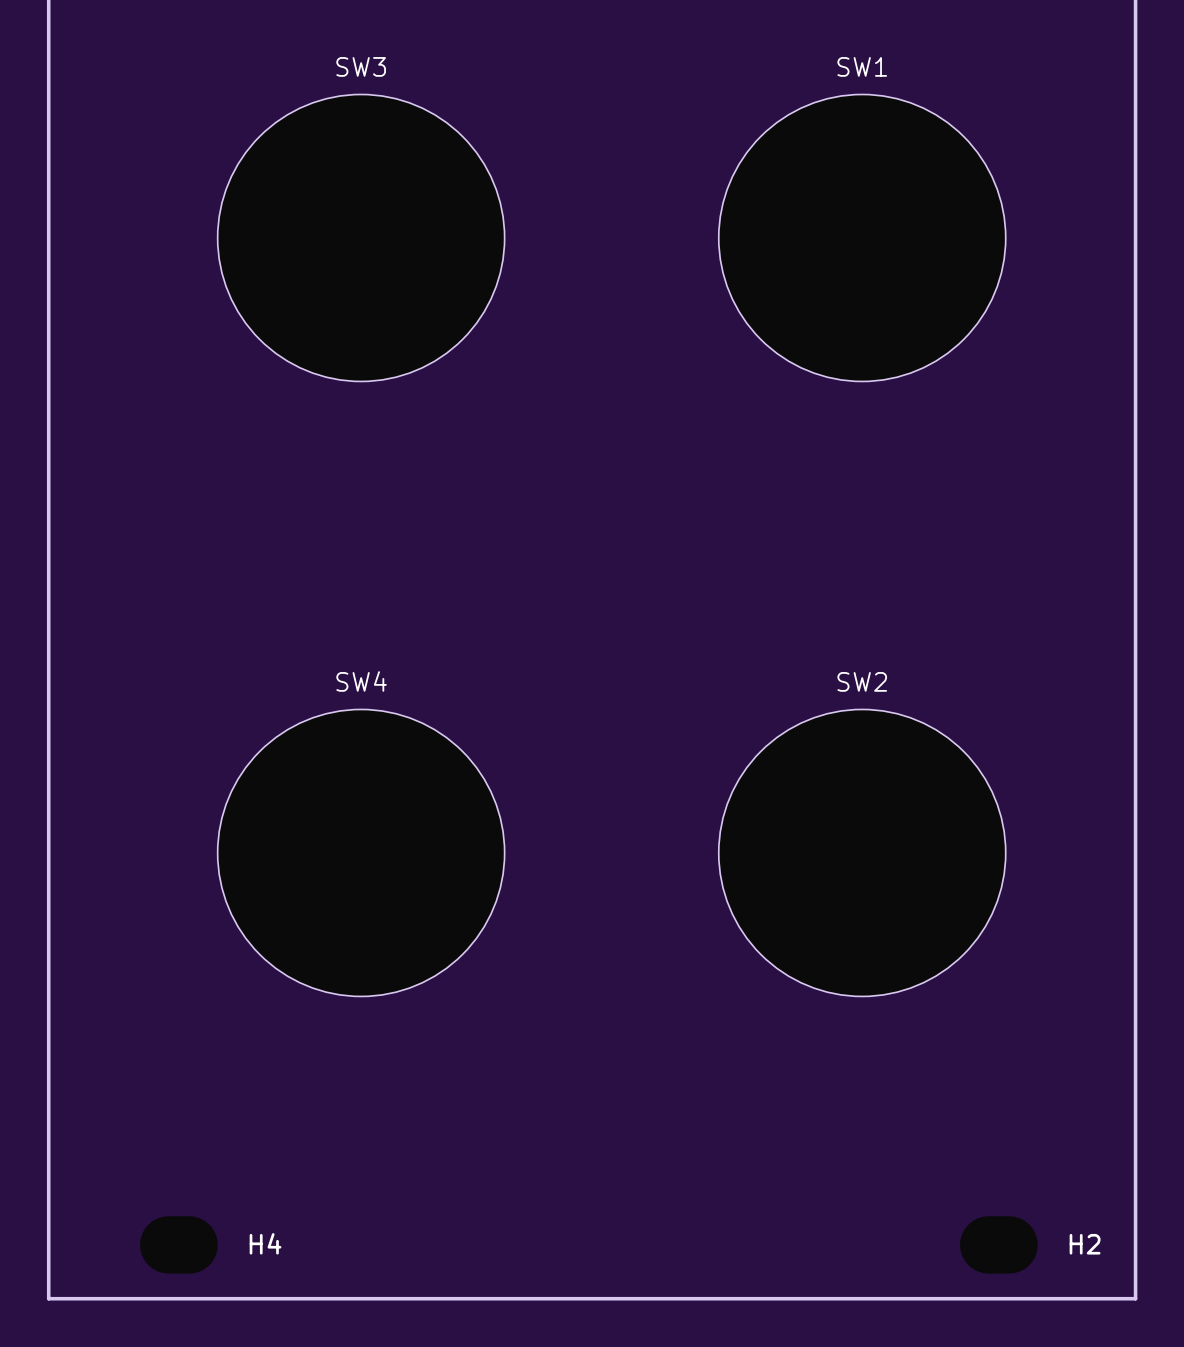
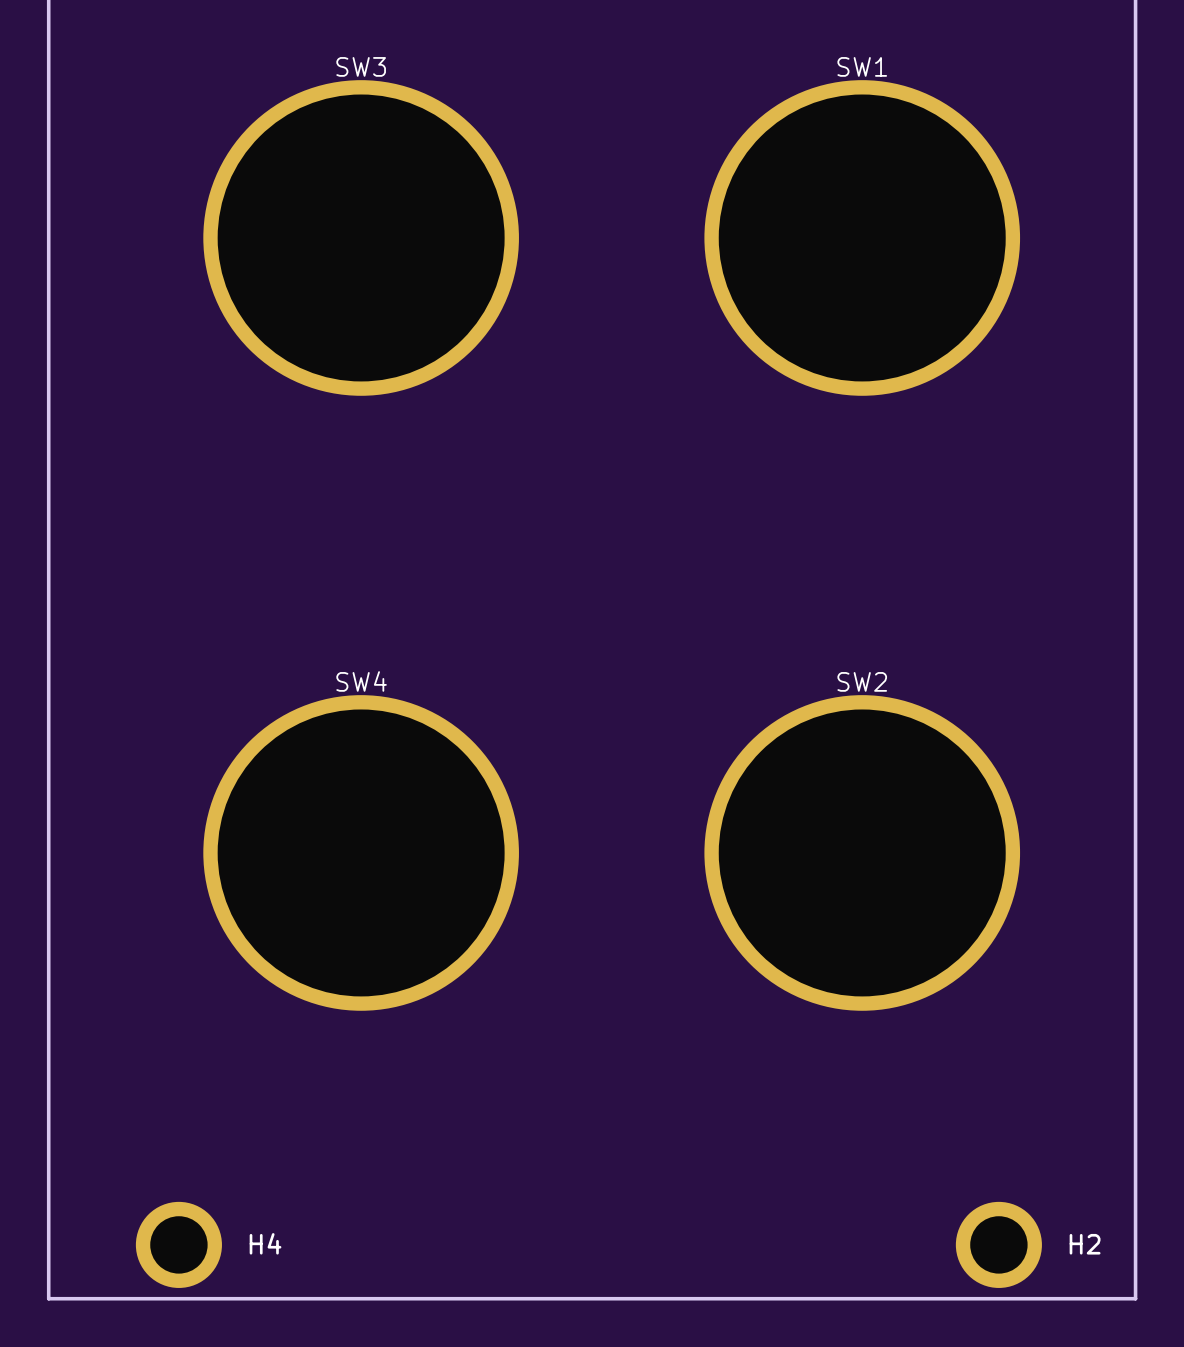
SW3 footprint: [217, 94, 505, 382] -> [203, 80, 519, 396]
SW1 footprint: [718, 94, 1006, 382] -> [704, 80, 1021, 396]
SW4 footprint: [217, 709, 505, 997] -> [203, 695, 519, 1011]
SW2 footprint: [718, 709, 1006, 997] -> [704, 695, 1021, 1011]
H4 footprint: [140, 1216, 218, 1274] -> [135, 1201, 222, 1288]
H2 footprint: [959, 1216, 1038, 1274] -> [955, 1201, 1042, 1288]

